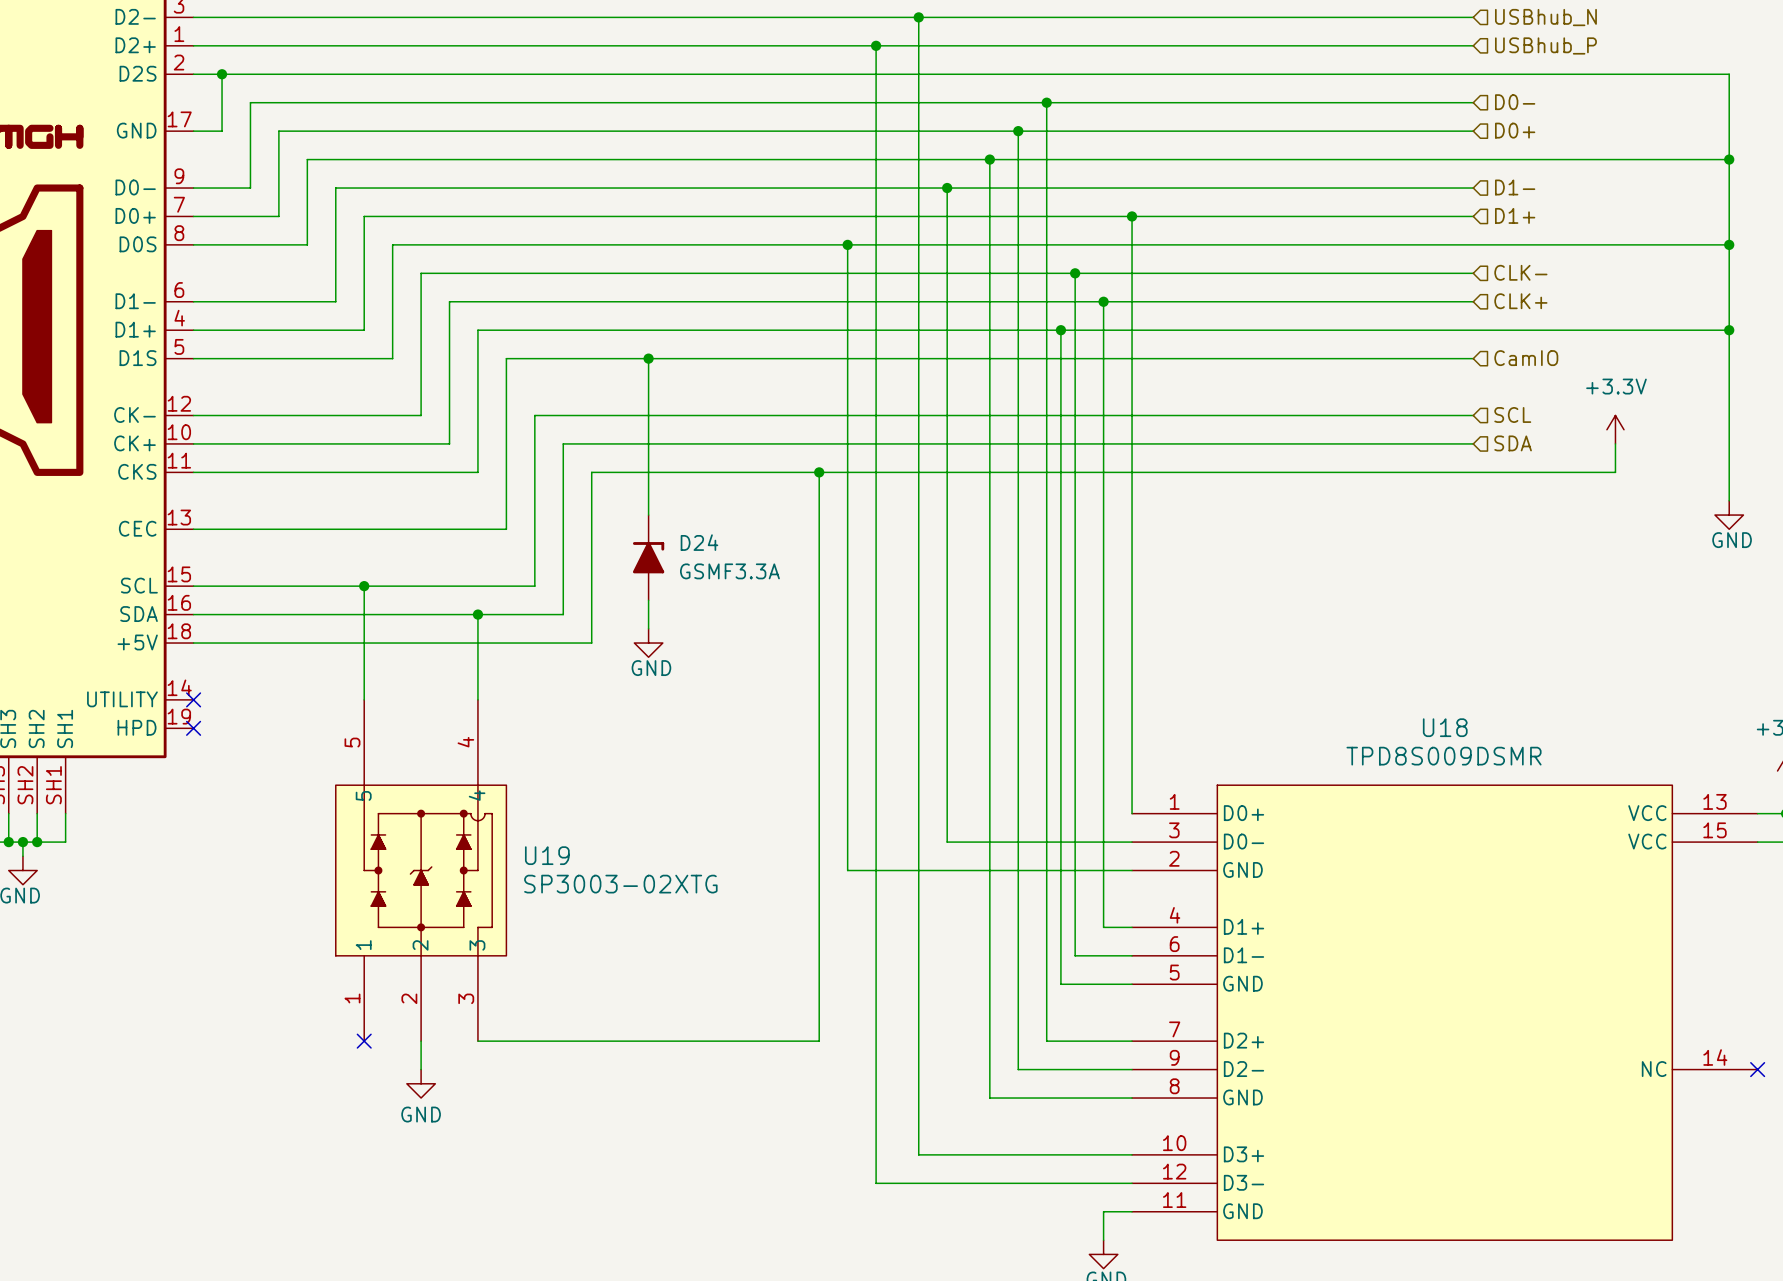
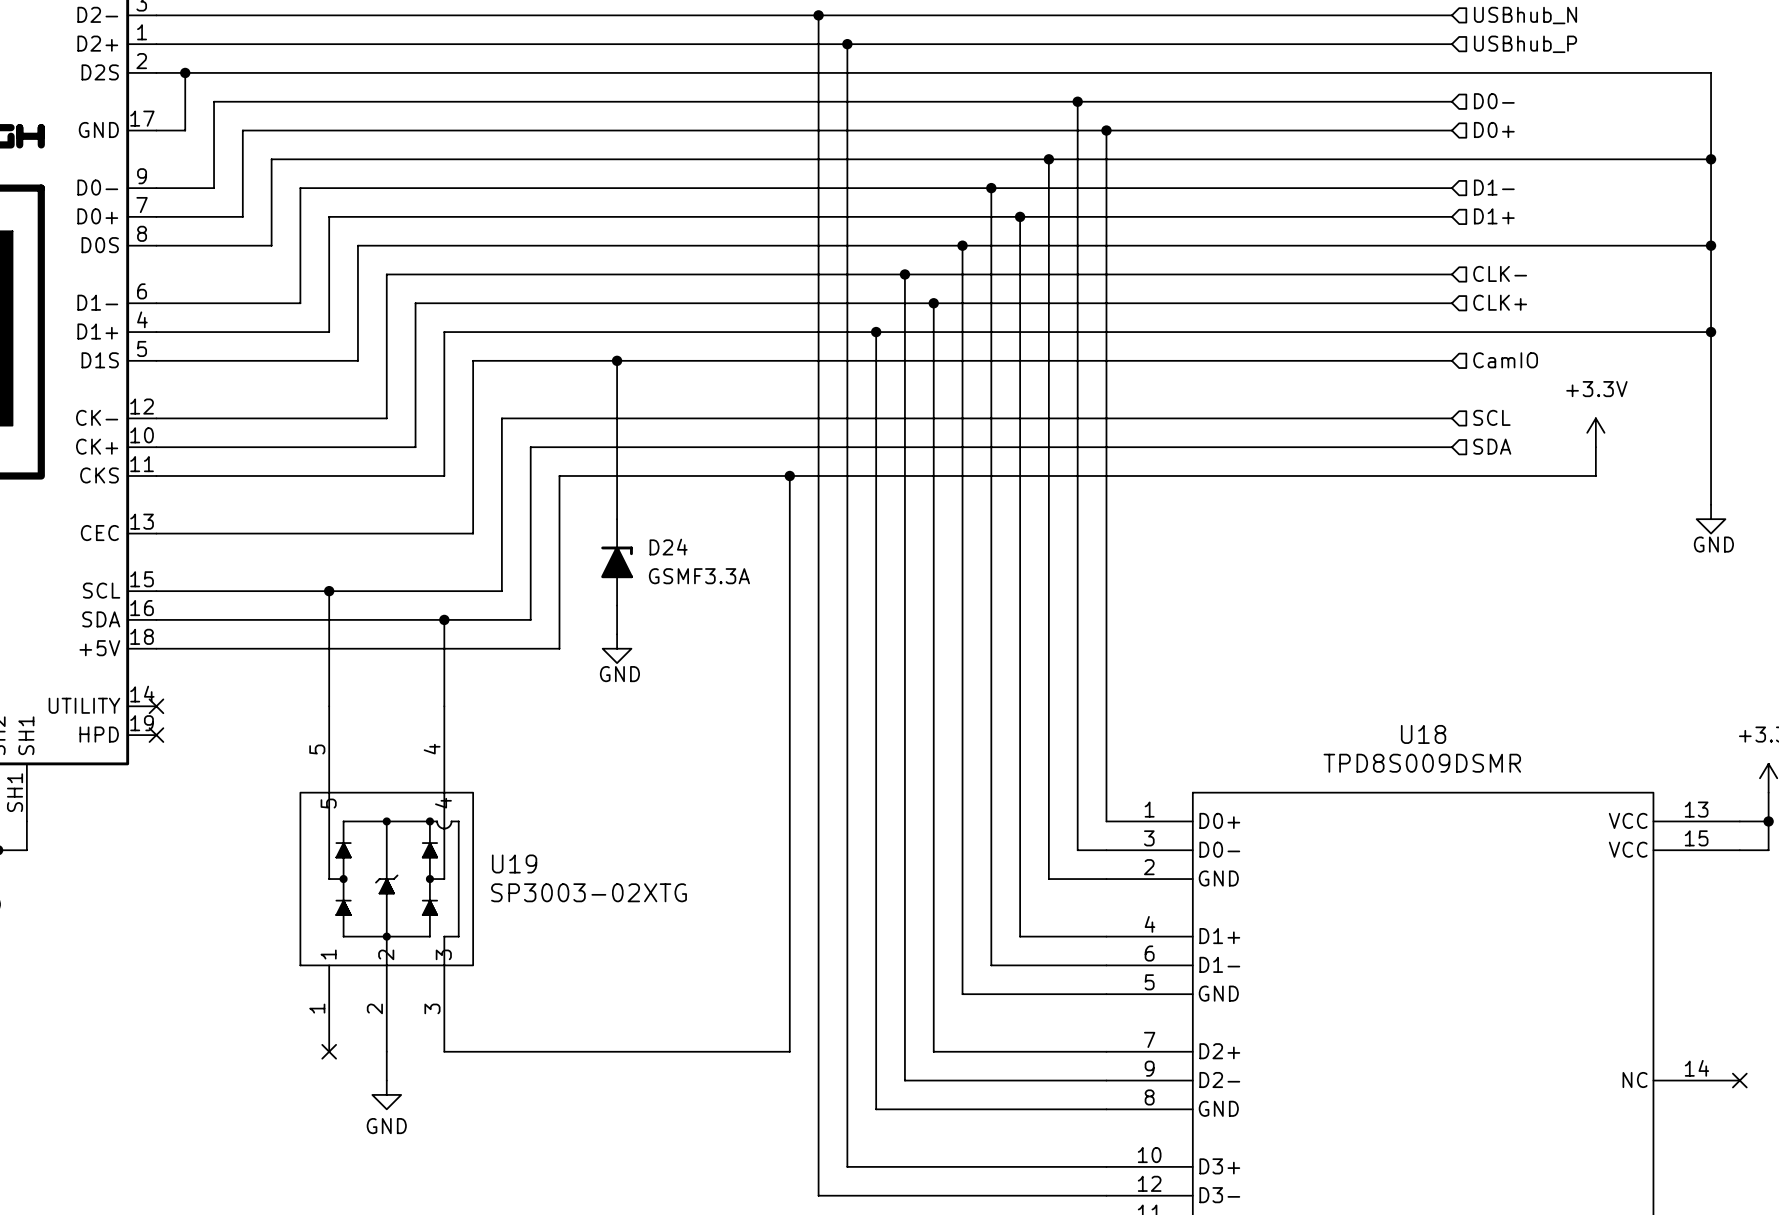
wire: none -> (818, 15) (818, 245)
junction: none -> (818, 15)
wire: (918, 17) (918, 1154) -> none
junction: (918, 17) -> none
wire: (1046, 102) (1046, 216) -> (1048, 159) (1048, 274)
junction: (1046, 102) -> none
wire: none -> (1077, 101) (1077, 303)
junction: none -> (1077, 101)
wire: (1018, 131) (1018, 188) -> none
junction: (1018, 131) -> none
junction: none -> (1106, 130)
wire: (989, 159) (989, 244) -> (1106, 130) (1106, 216)
junction: (989, 159) -> none
junction: none -> (1048, 159)
wire: (947, 188) (947, 842) (1103, 842) (1103, 927) -> none
junction: (947, 188) -> none
junction: none -> (991, 188)
junction: none -> (1020, 216)
junction: (1132, 216) -> none
junction: (847, 244) -> none
junction: none -> (962, 245)
wire: none -> (904, 274) (904, 1080) (991, 1080)
junction: none -> (904, 274)
junction: (1075, 273) -> none
wire: none -> (933, 303) (933, 1051) (1020, 1051)
junction: none -> (933, 303)
junction: (1103, 301) -> none
wire: none -> (876, 332) (876, 1109) (962, 1109)
junction: none -> (876, 332)
wire: (1060, 330) (1060, 984) -> none
junction: (1060, 330) -> none
wire: (847, 870) (1075, 870) (1075, 955) -> (818, 879) (818, 1195) (847, 1195)
wire: (1046, 927) (1046, 1041) -> (1020, 936) (1077, 936)
wire: (1018, 955) (1018, 1069) -> (991, 965) (1048, 965)
wire: (989, 984) (989, 1098) -> (962, 994) (1034, 994)
wire: (876, 1154) (876, 1183) -> (847, 1166) (890, 1166)

